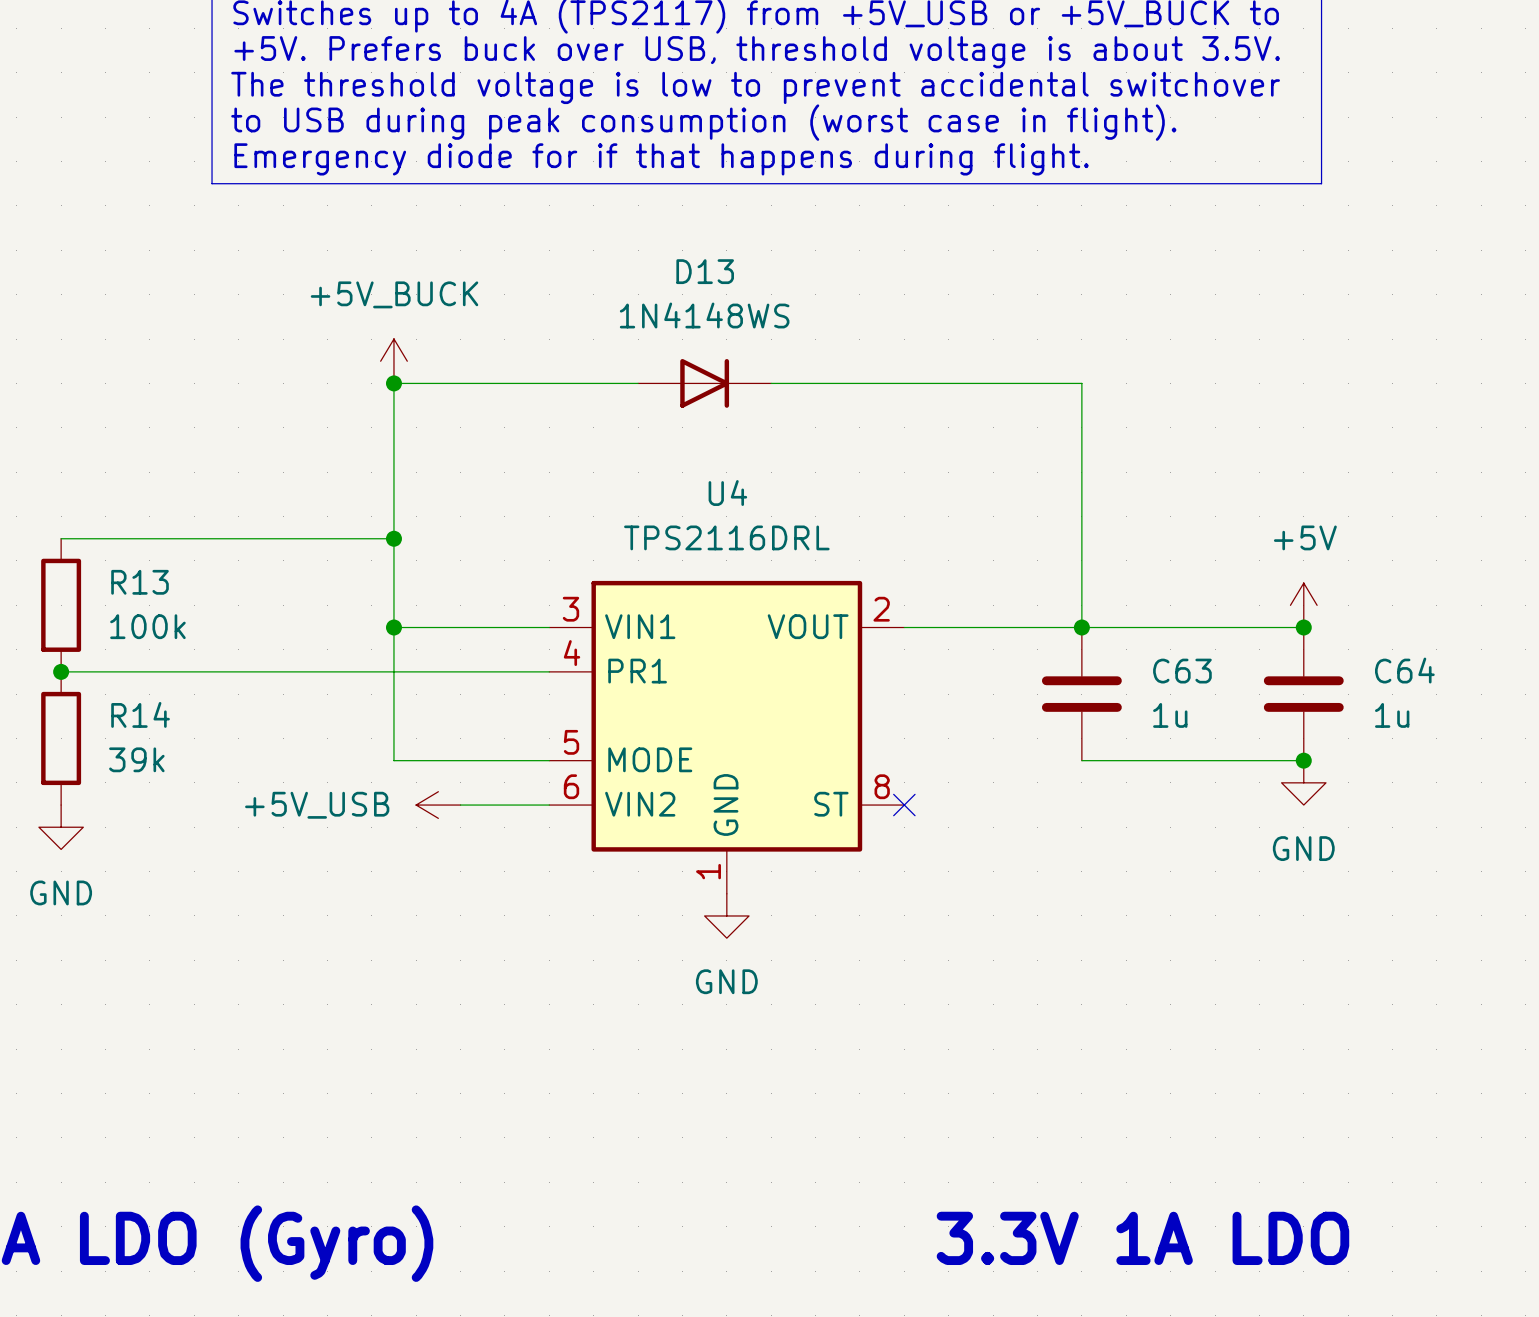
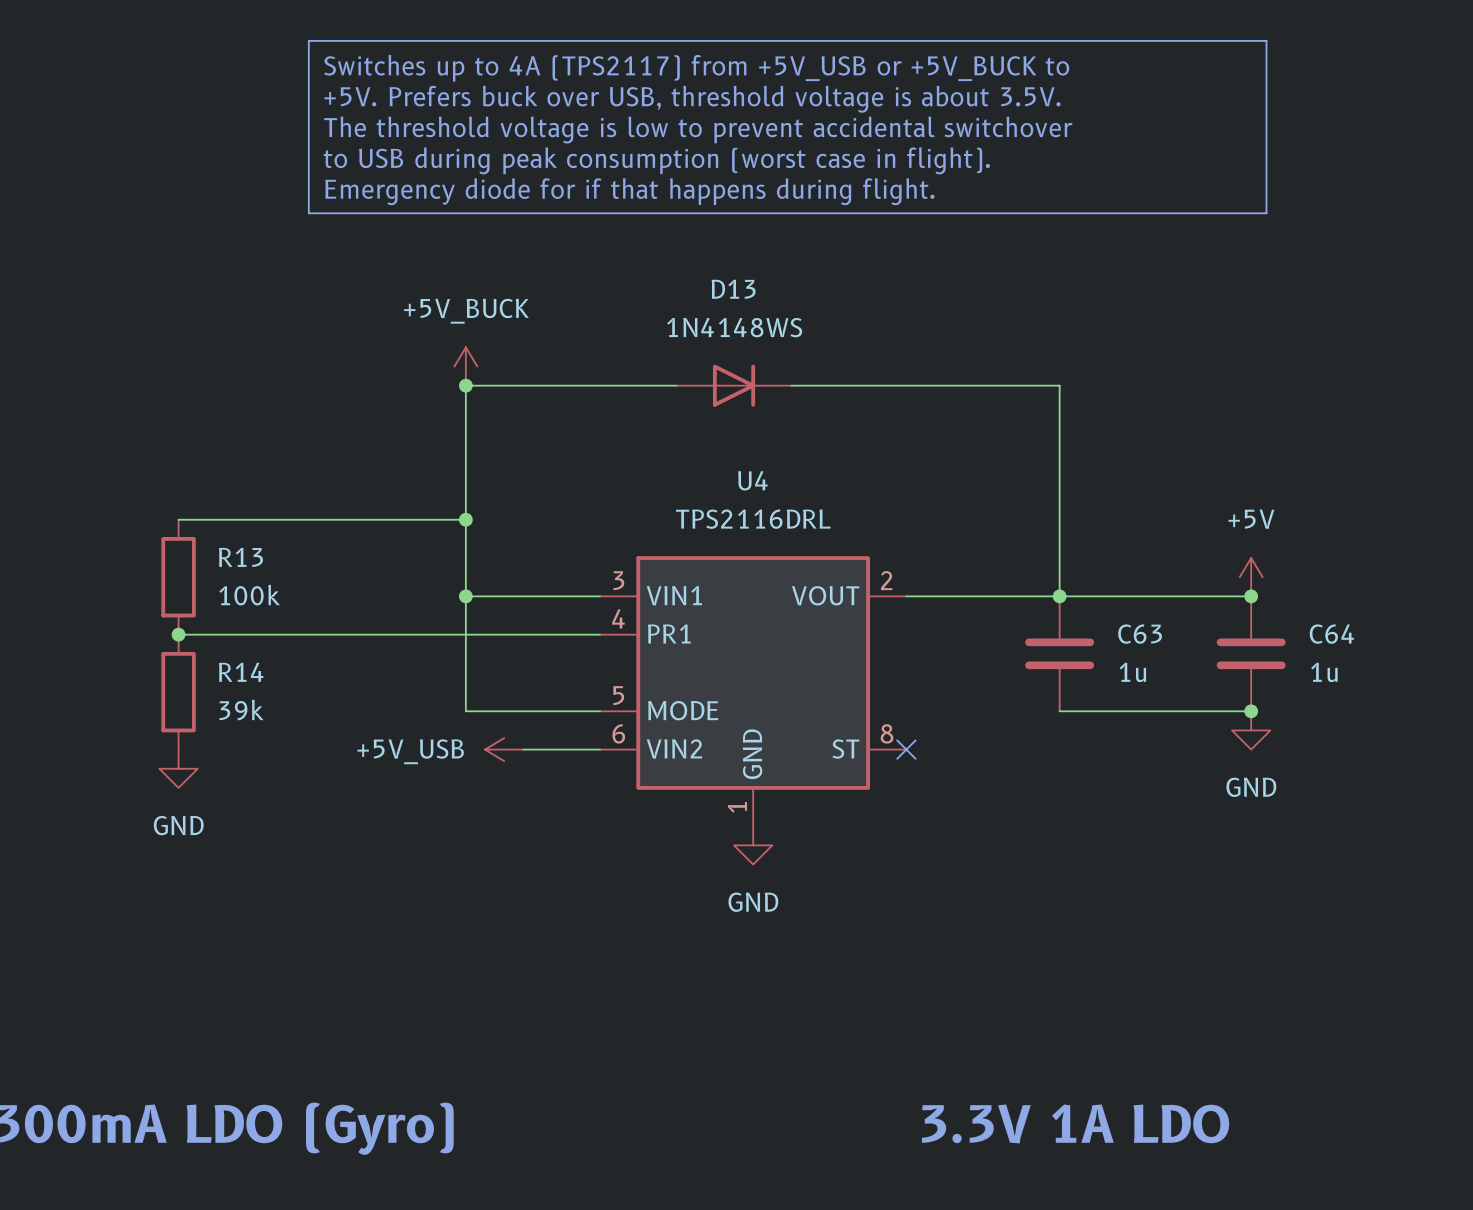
text position: 3.3V 1A LDO (1142, 1238) -> 3.3V 1A LDO (1075, 1123)

